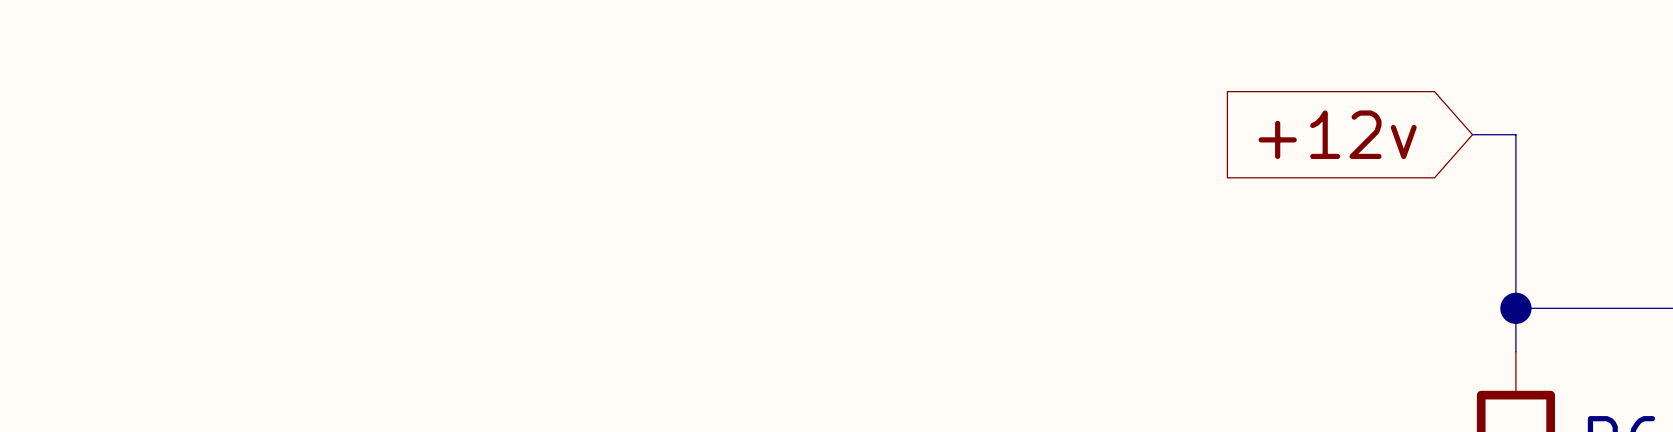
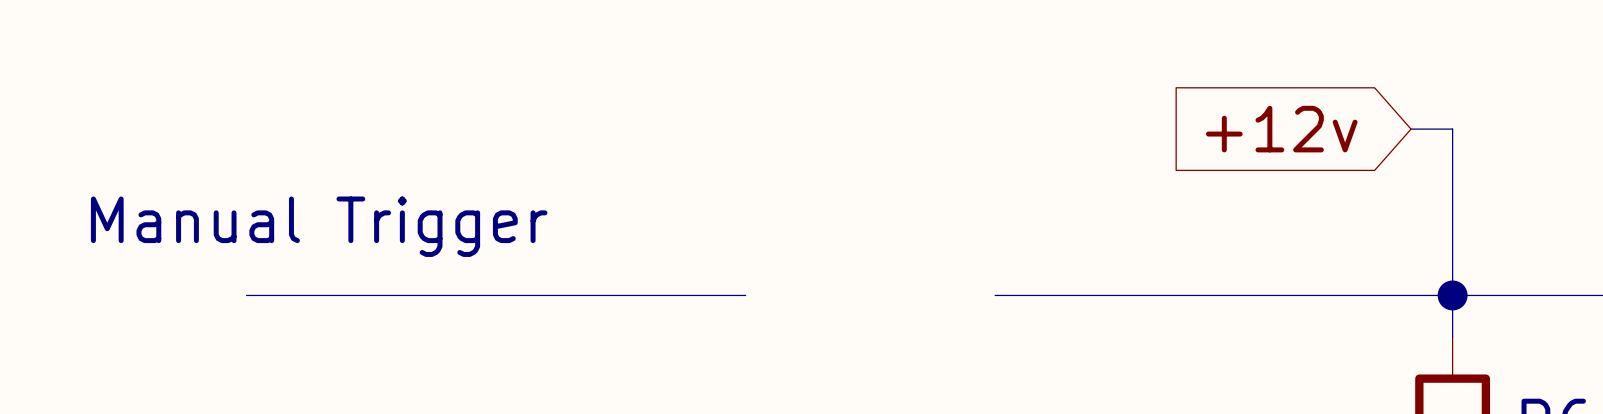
text: none -> Manual Trigger (319, 226)
wire: none -> (246, 295) (745, 295)
wire: none -> (995, 295) (1452, 295)

